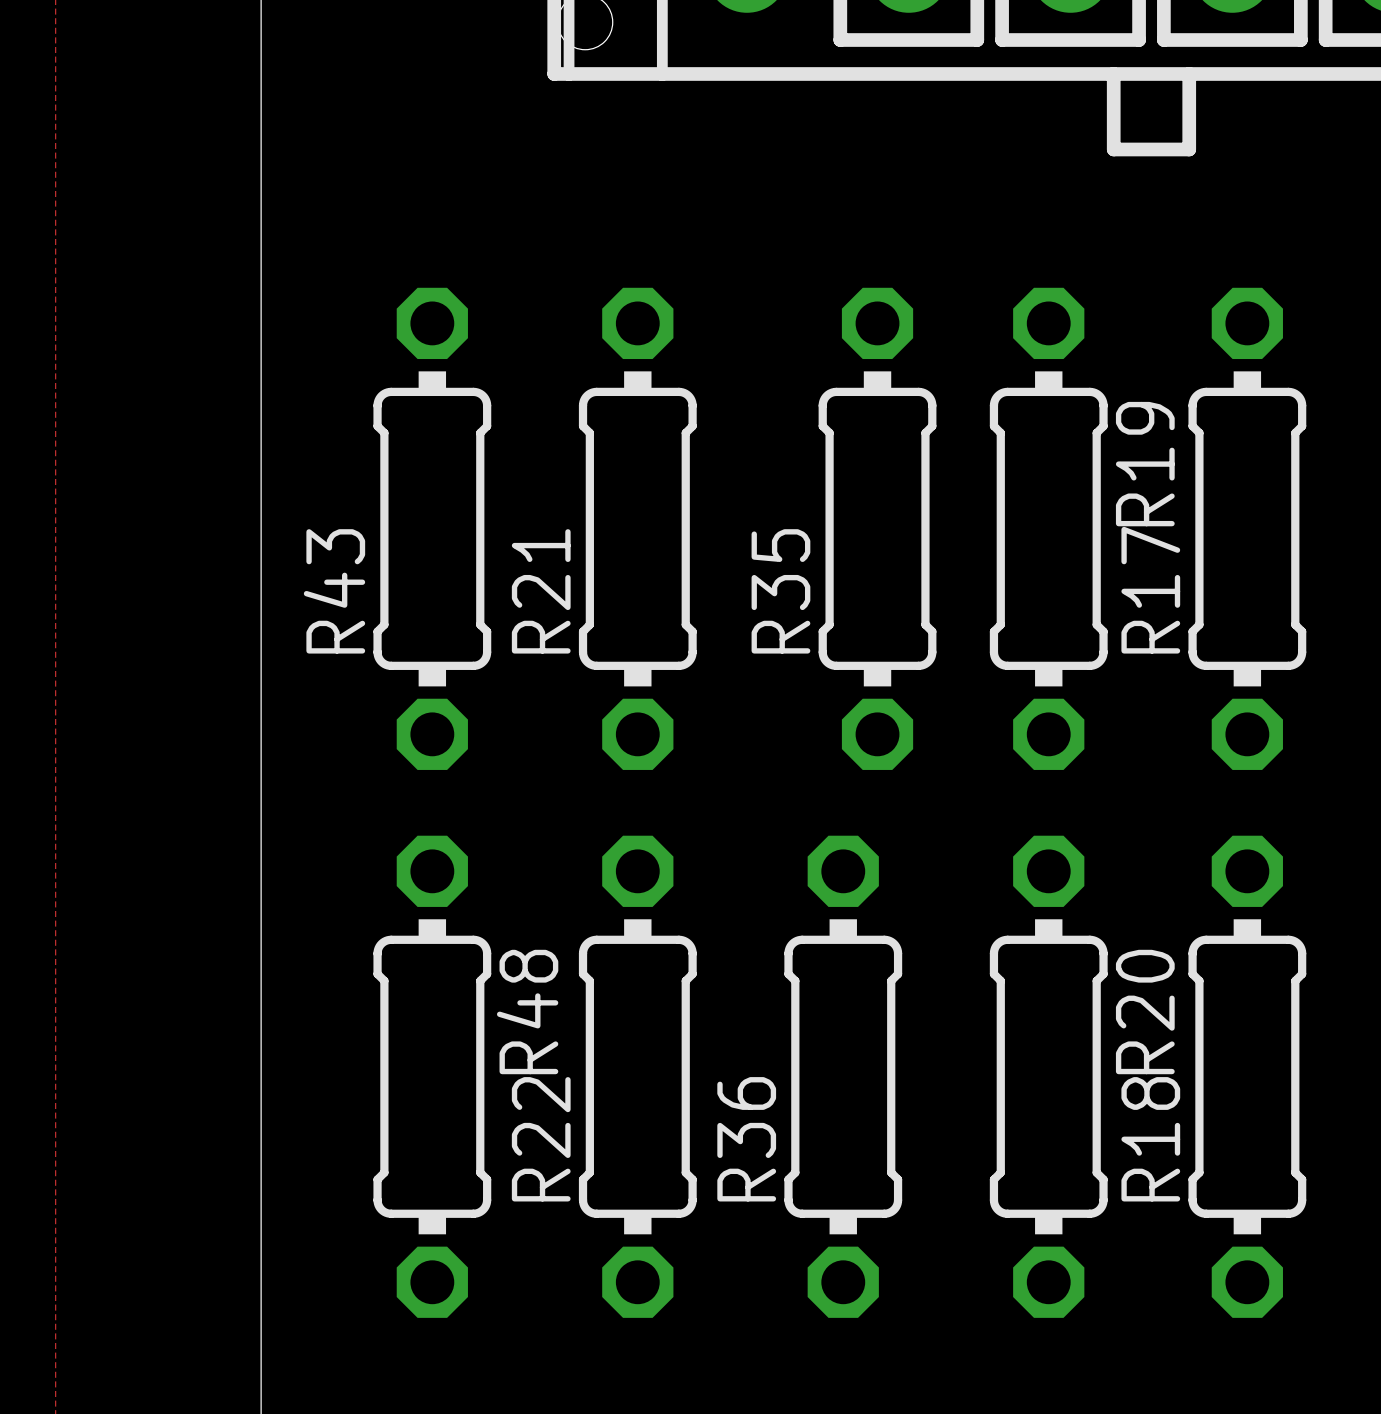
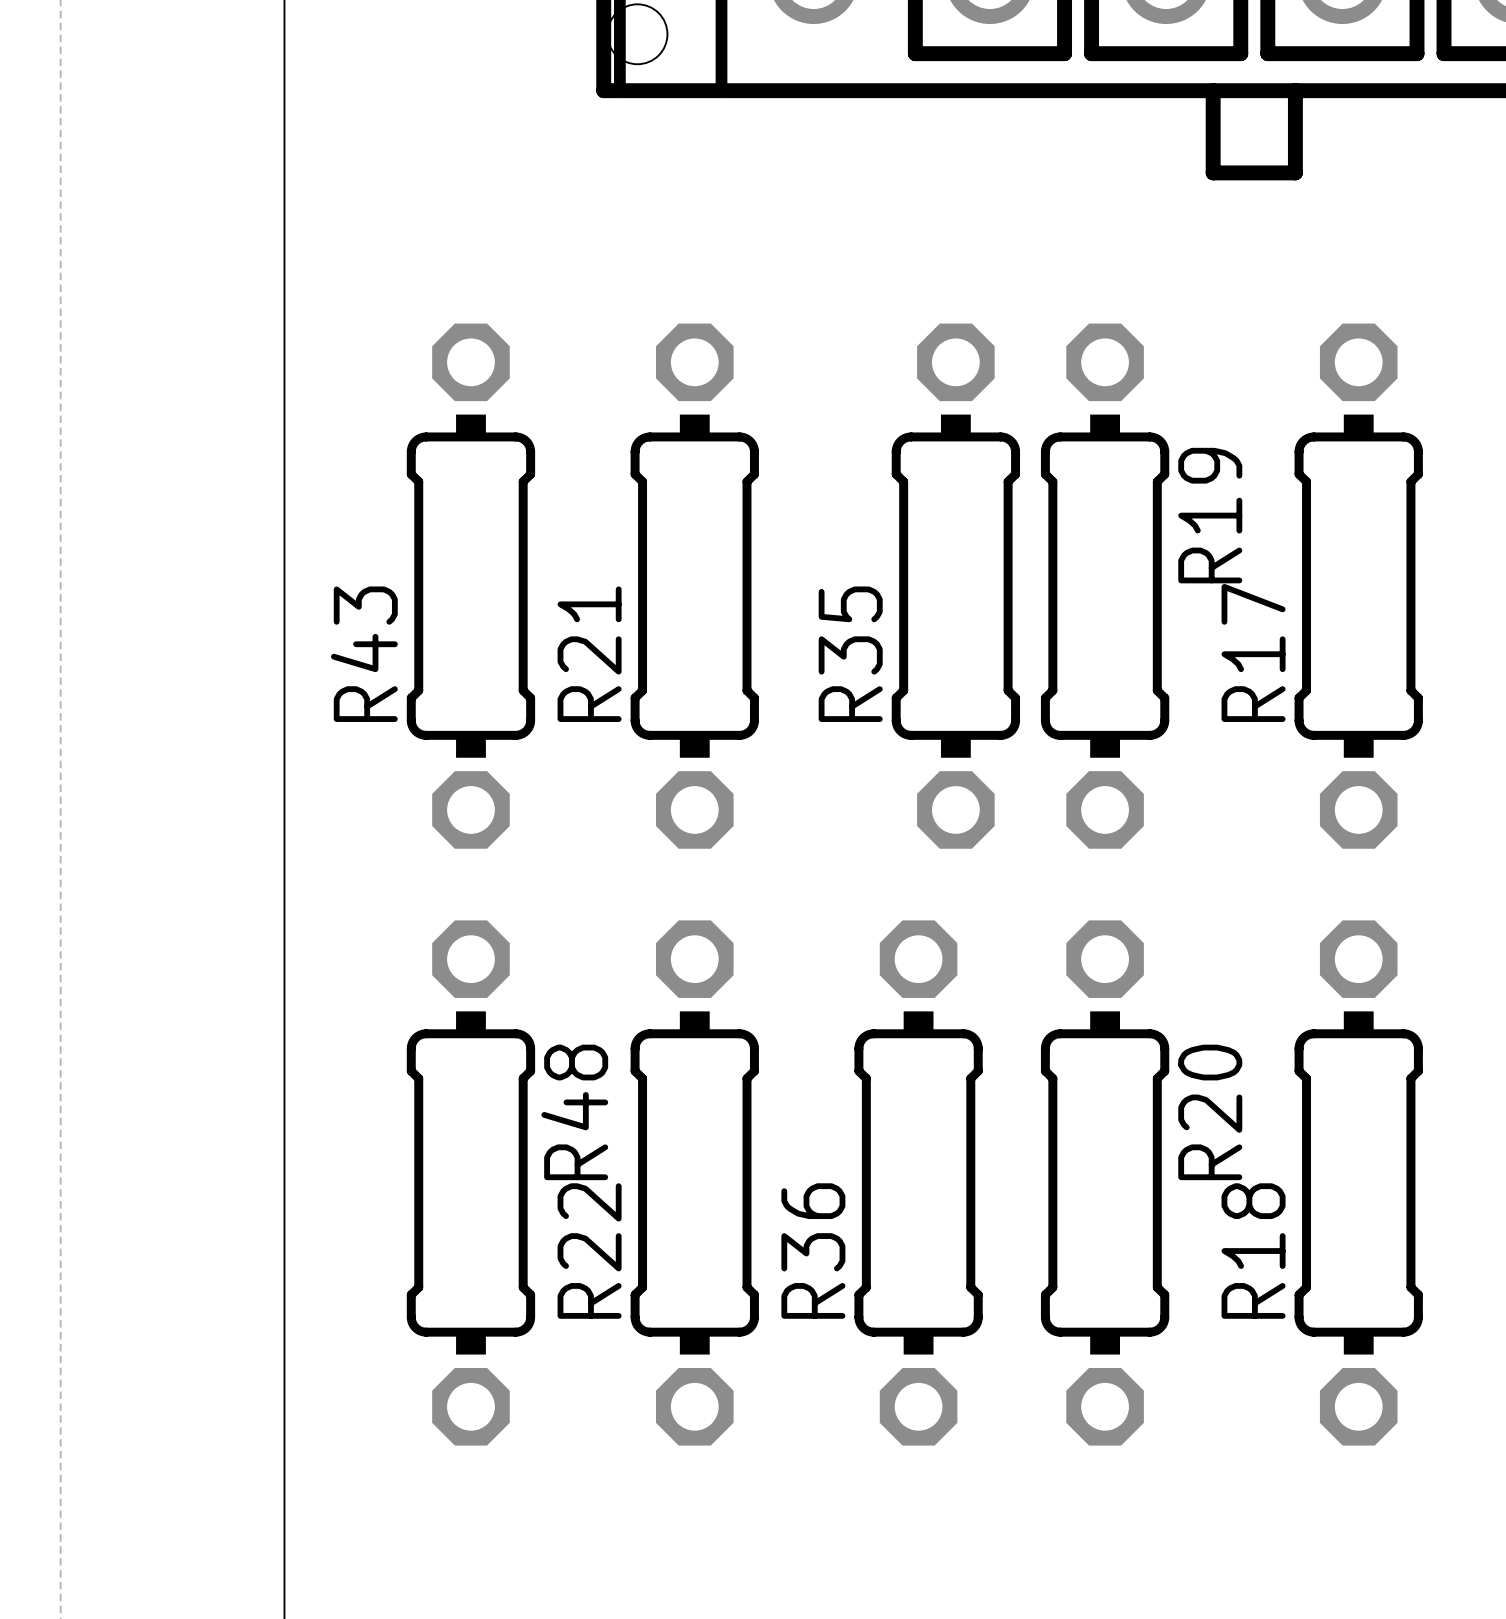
R19 position: (1048, 528) -> (1105, 586)
R20 position: (1048, 1076) -> (1105, 1182)

